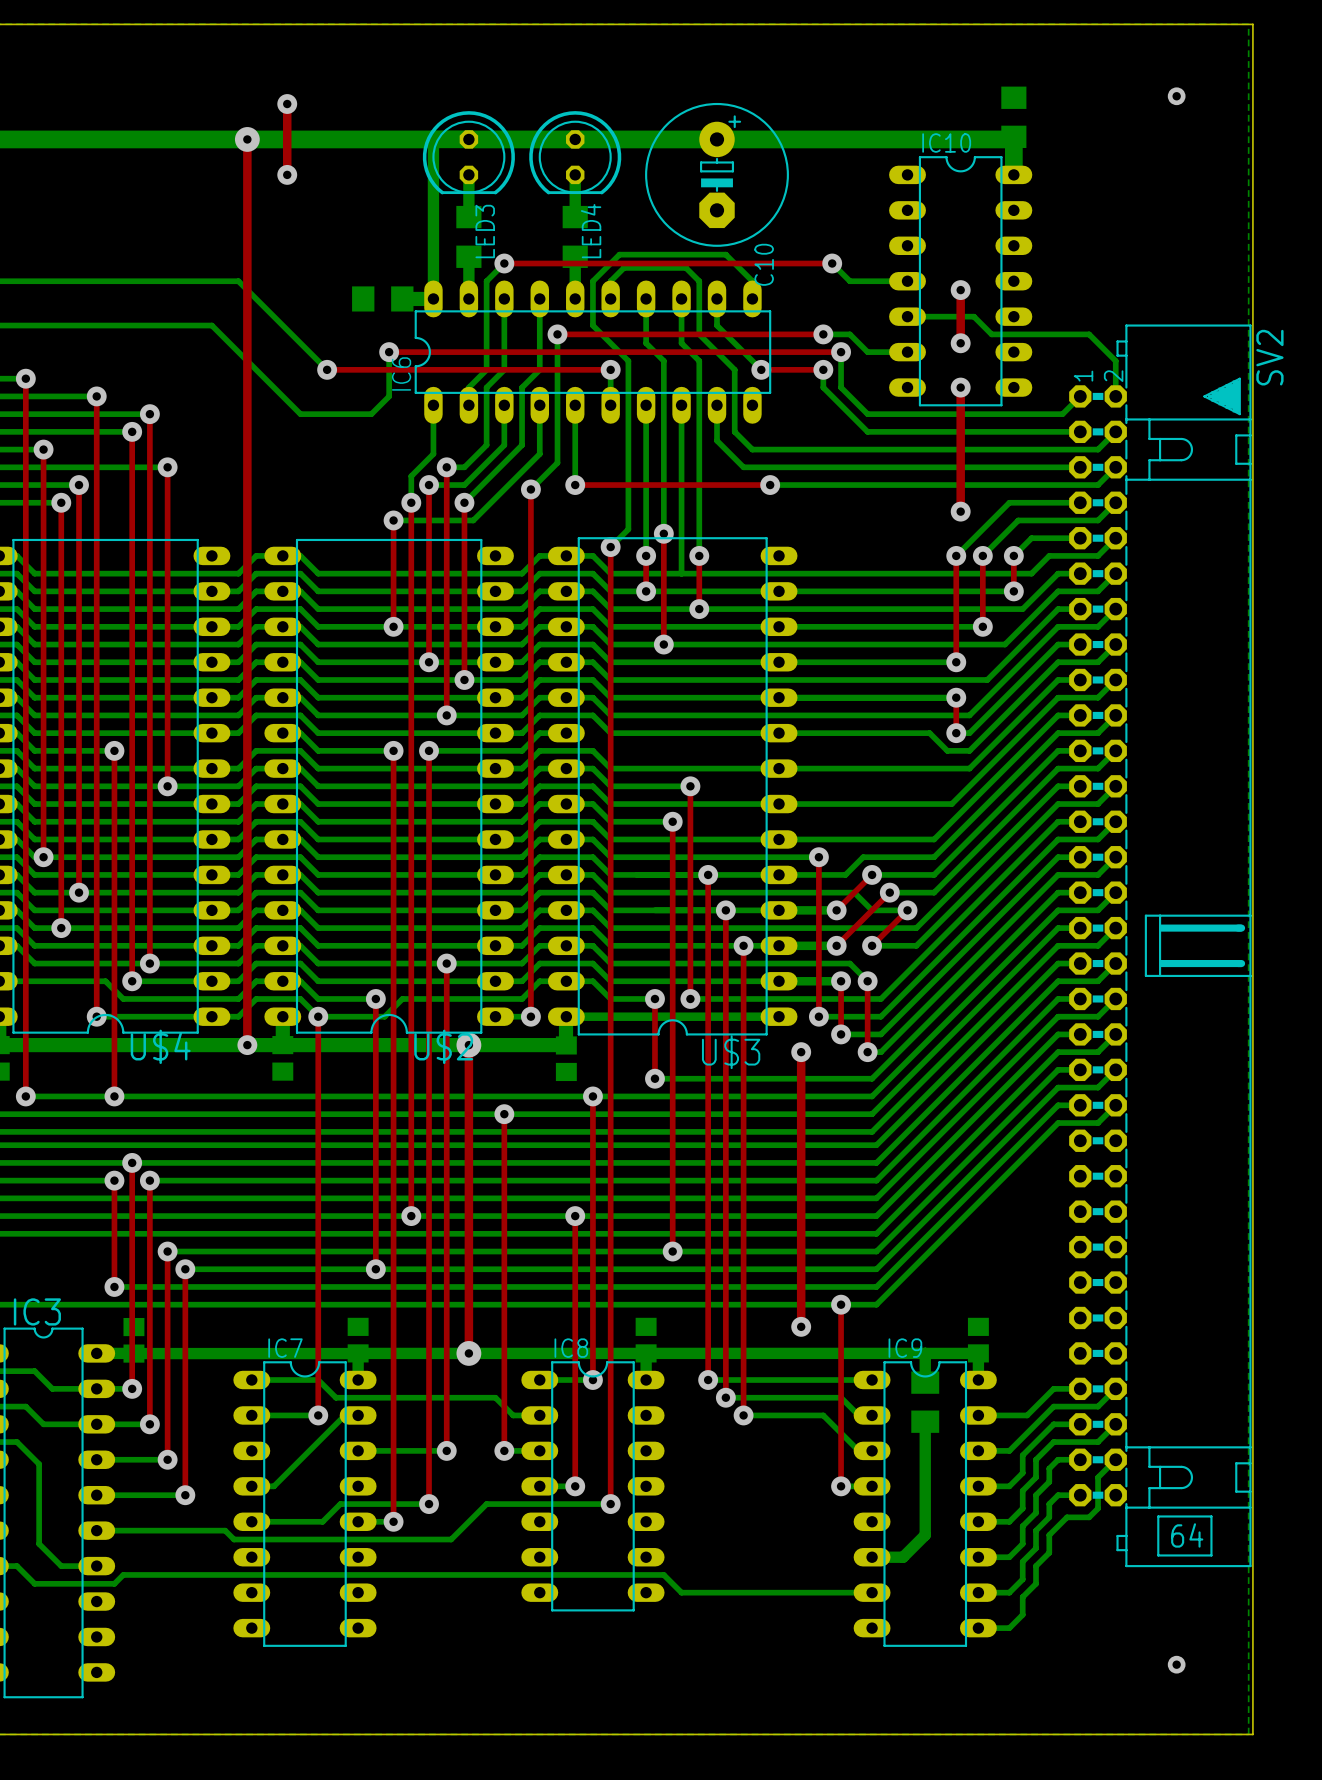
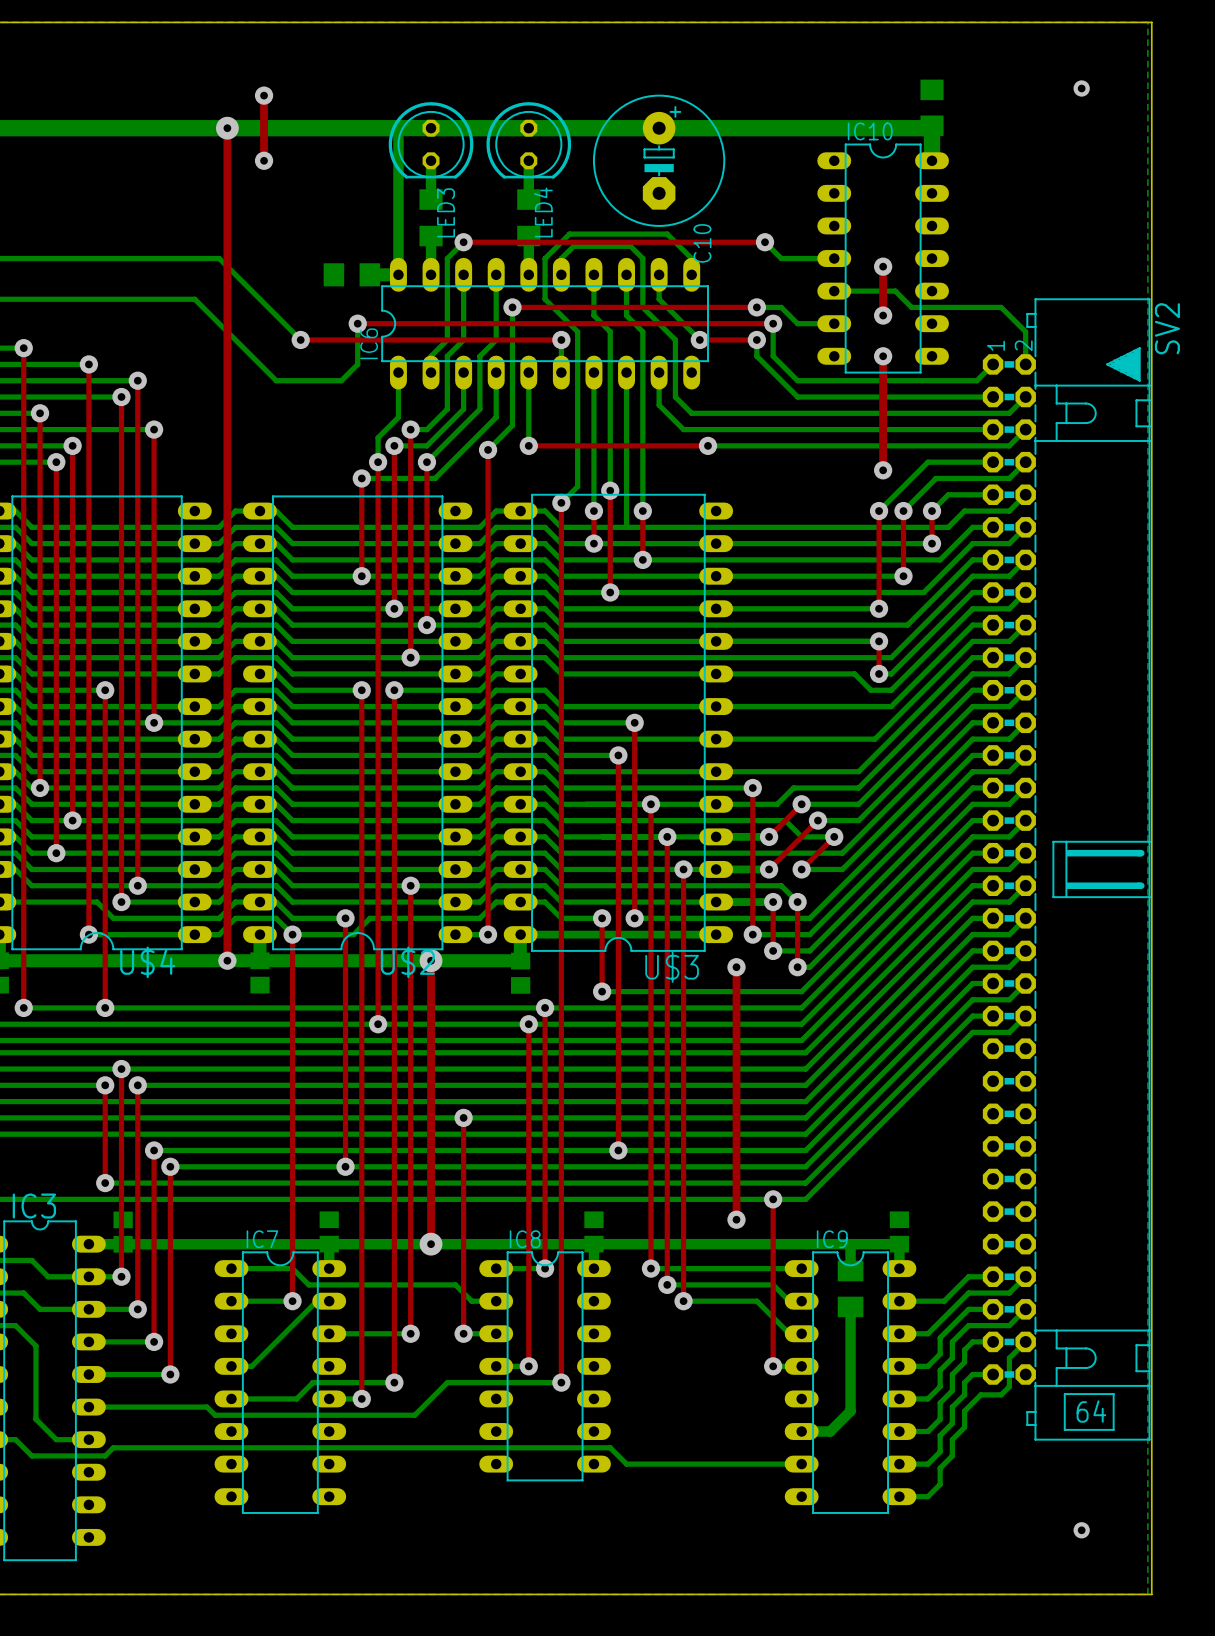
top track: (411, 1114) (411, 1216) -> none
via: none -> (378, 1024)
top track: (504, 1114) (504, 1216) -> (528, 1024) (528, 1117)
via: (504, 1114) -> none
via: none -> (528, 1024)
via: (411, 1216) -> none
via: none -> (463, 1117)
via: (575, 1216) -> none

